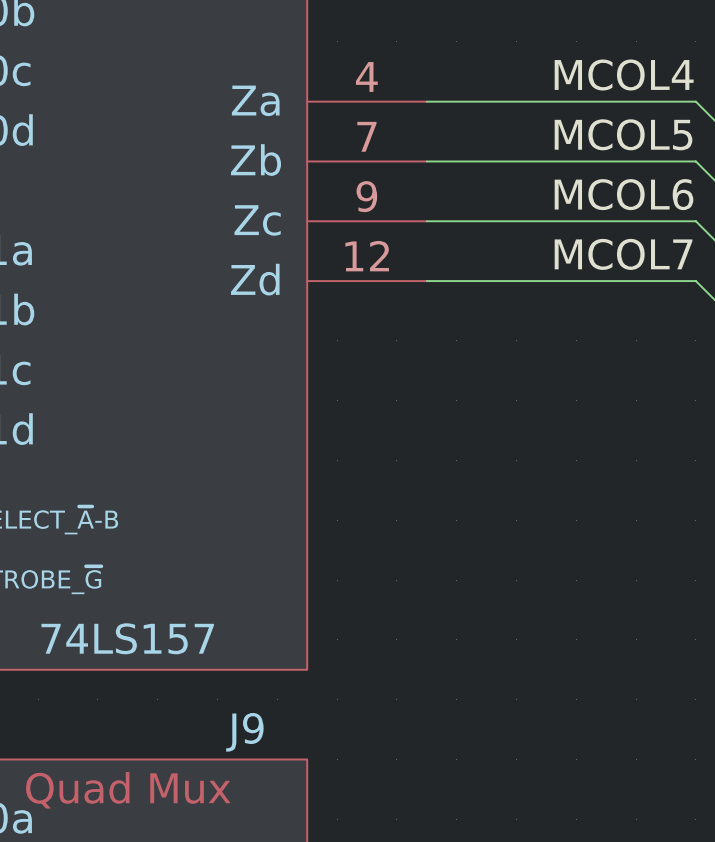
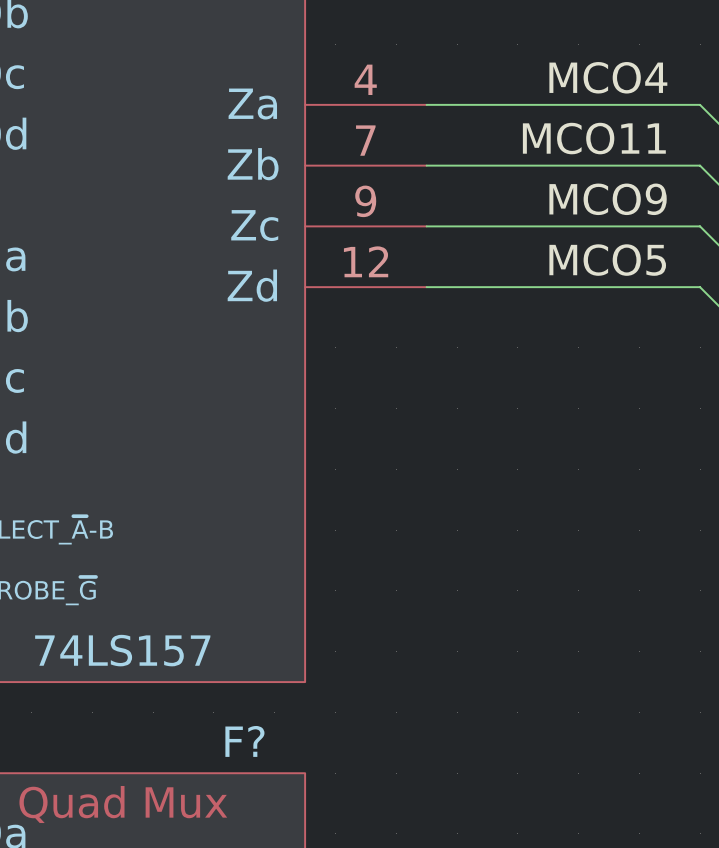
label: MCOL4 (624, 75) -> MCO4 (608, 77)
label: none -> MCO11 (594, 138)
label: MCOL5 (623, 134) -> none
label: MCOL6 (624, 194) -> MCO9 (608, 199)
label: MCOL7 (623, 254) -> MCO5 (607, 260)
J9 name: J9 (244, 732) -> F? (244, 741)

